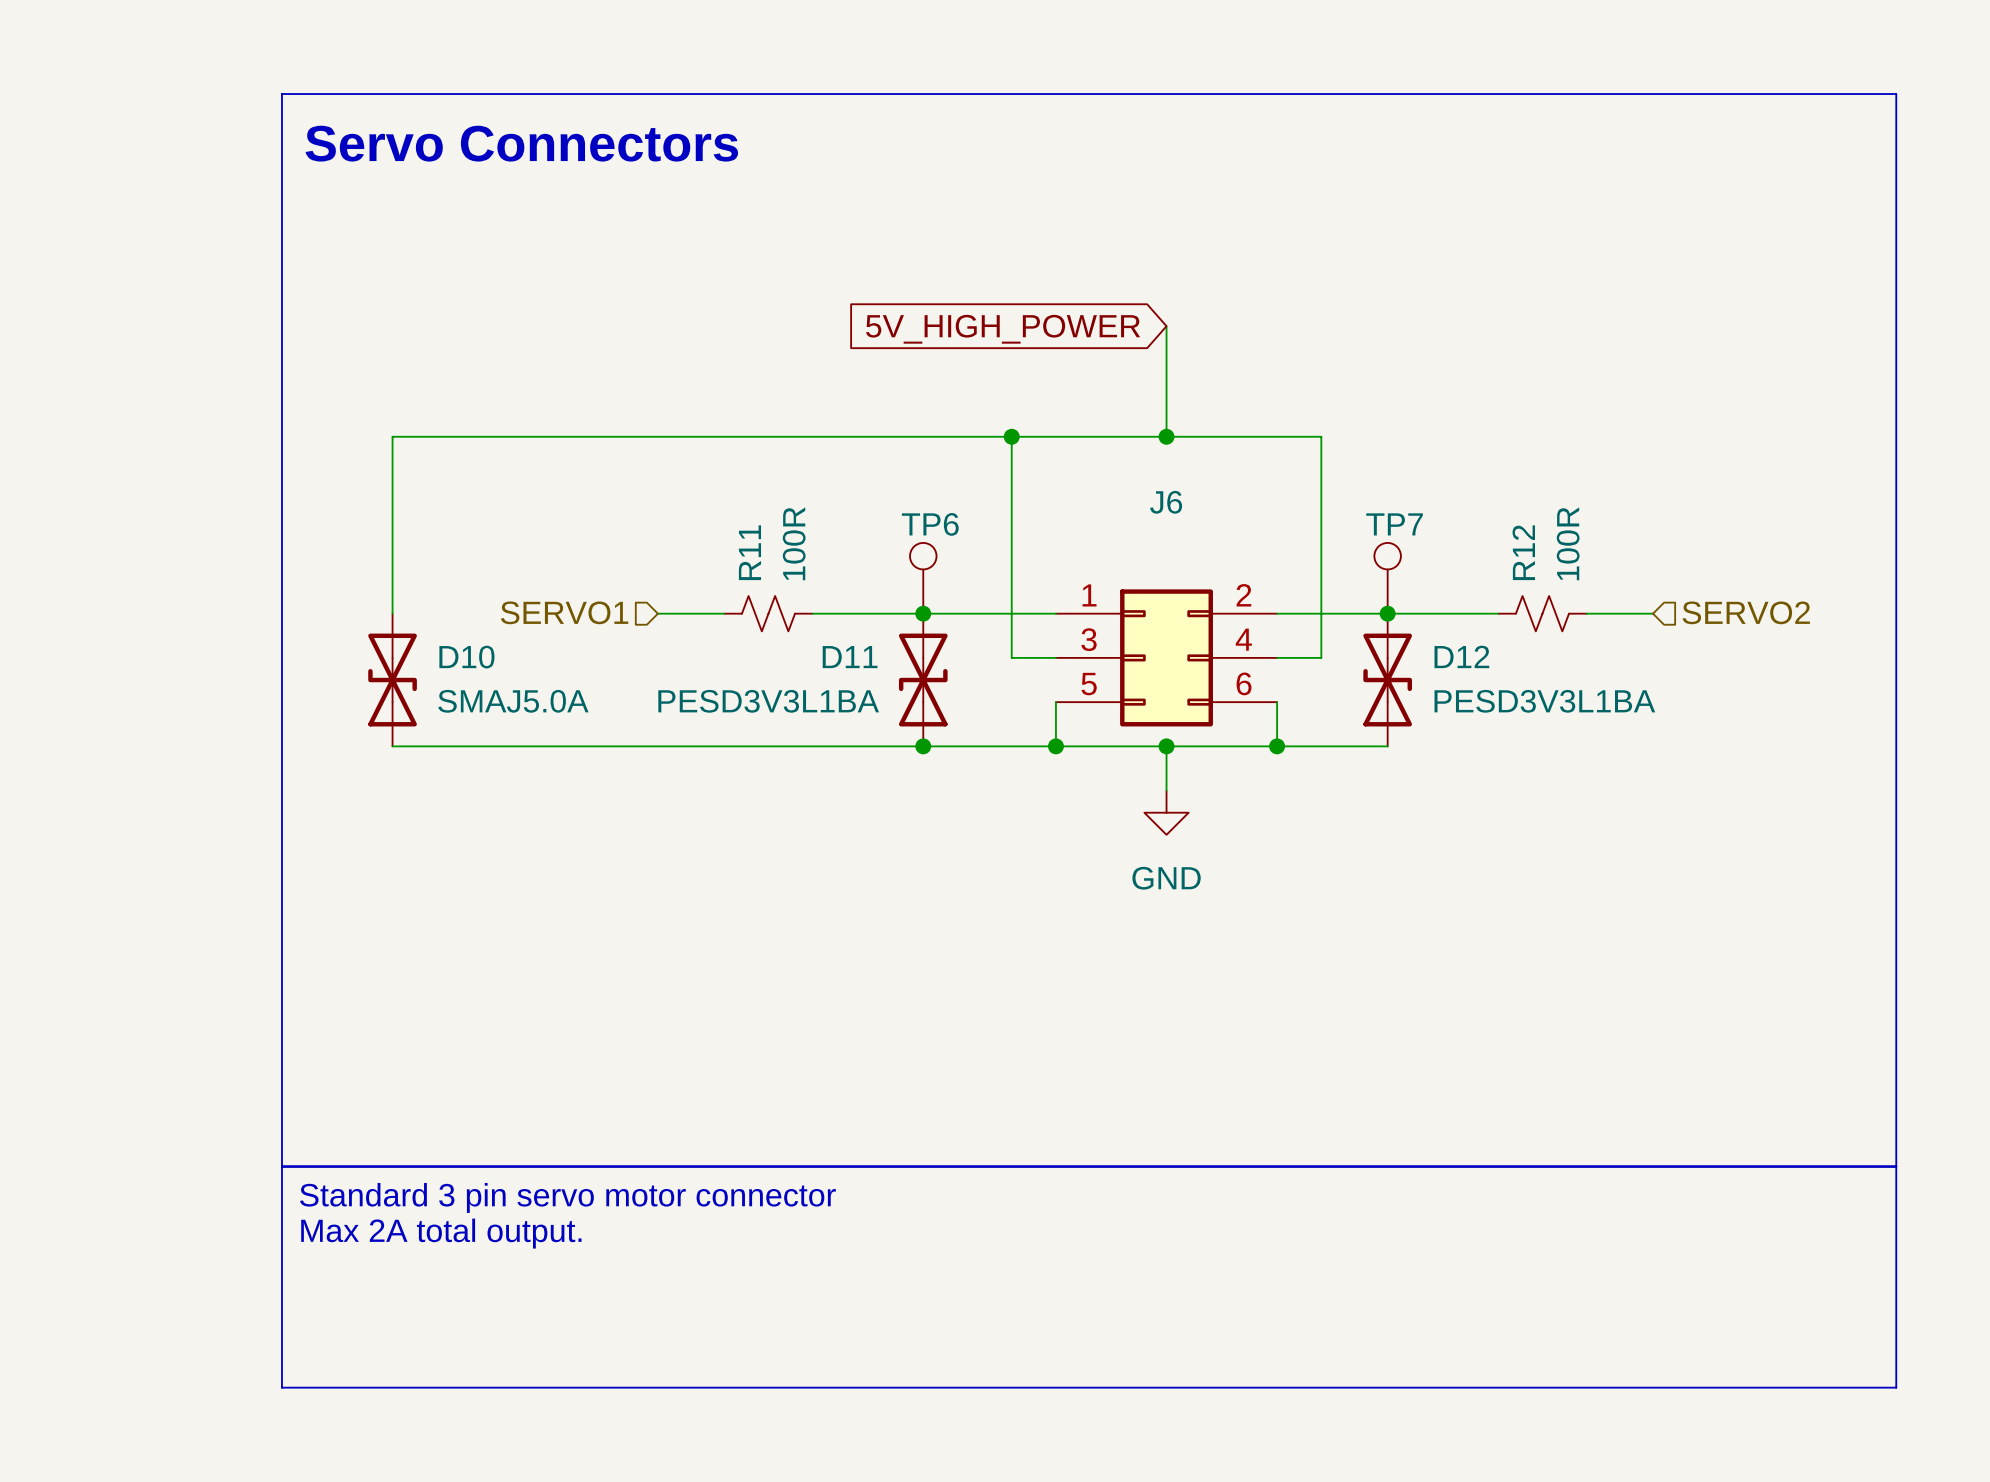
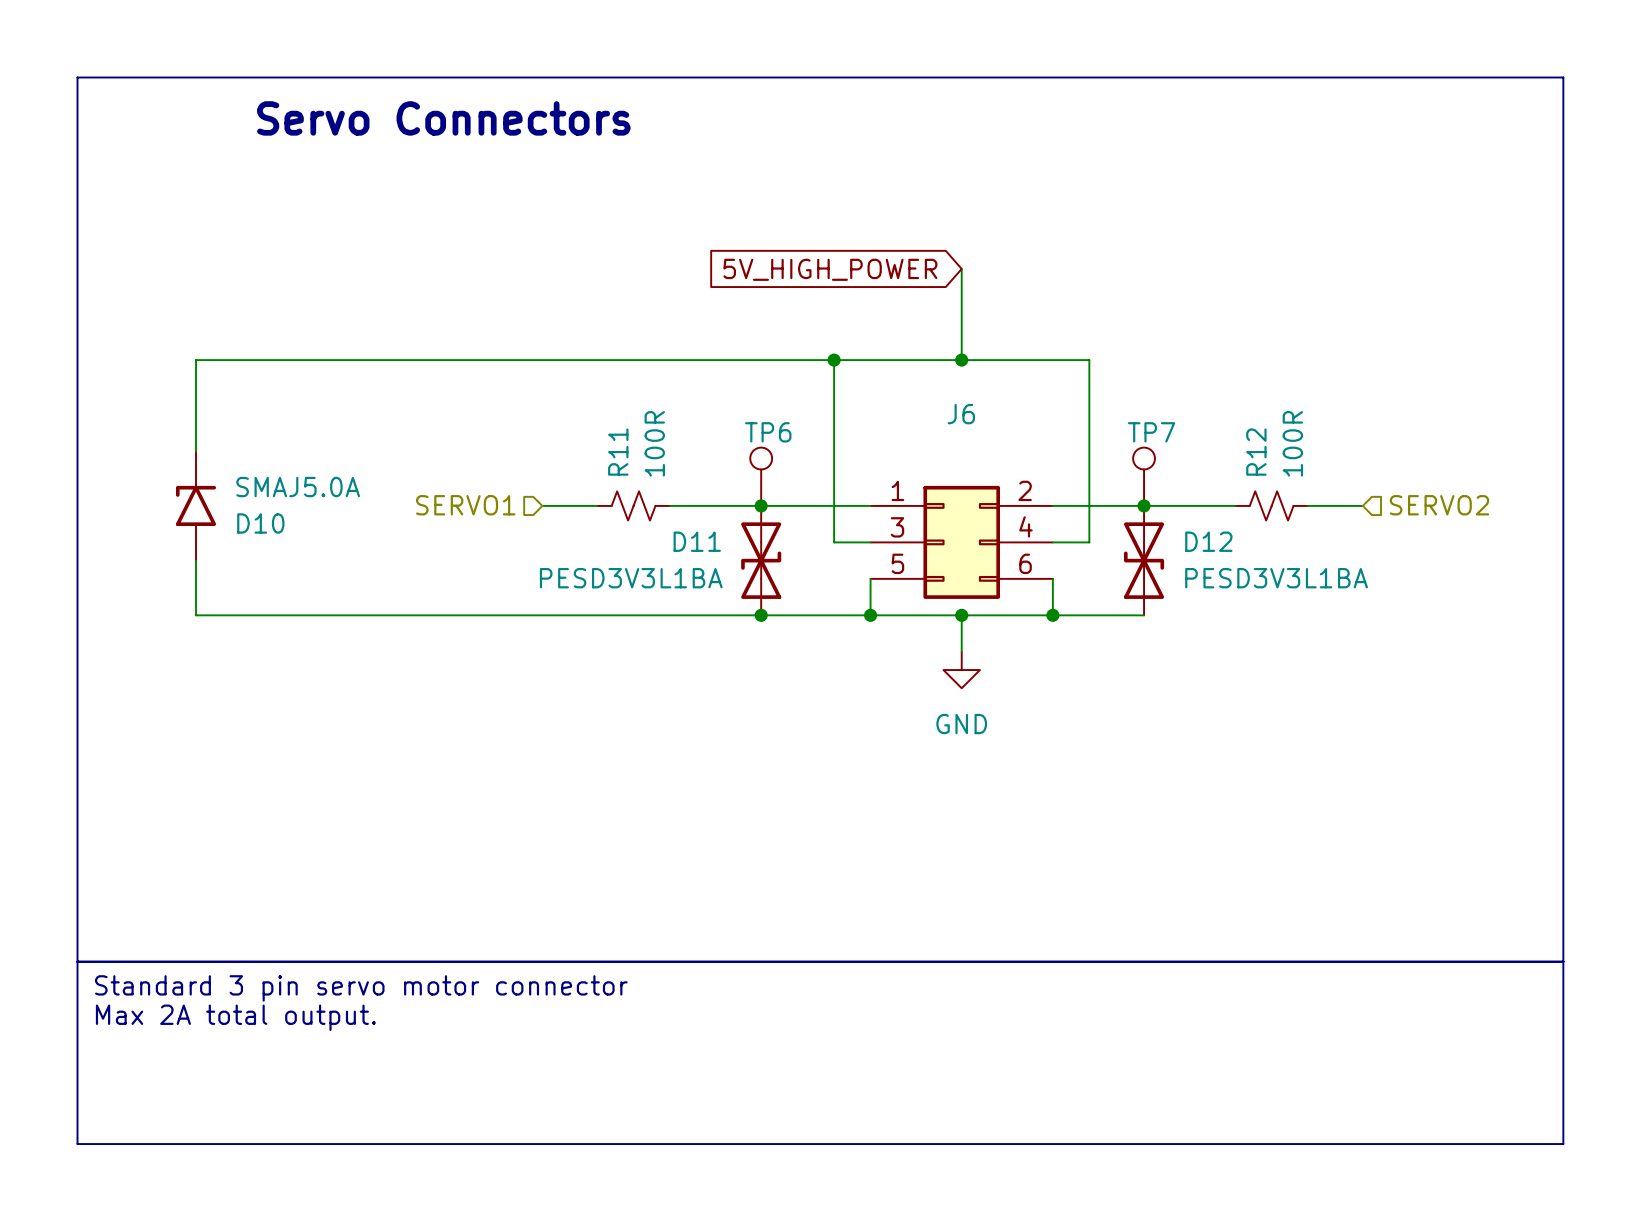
line: (281, 94) (281, 1387) -> (232, 77) (77, 77) (77, 1144) (232, 1144)
wire: (392, 436) (392, 613) -> (323, 360) (196, 360) (196, 451)
D10 symbol: [368, 613, 417, 747] -> [175, 451, 217, 561]
D10 name position: D10 (466, 657) -> D10 (260, 523)
wire: none -> (196, 560) (196, 615) (323, 615)
D10 value position: SMAJ5.0A (513, 701) -> SMAJ5.0A (298, 487)
line: none -> (77, 961) (232, 961)
text position: Standard 3 pin servo motor connector (567, 1197) -> Standard 3 pin servo motor connector (361, 988)
text position: Max 2A total output. (441, 1233) -> Max 2A total output. (235, 1017)

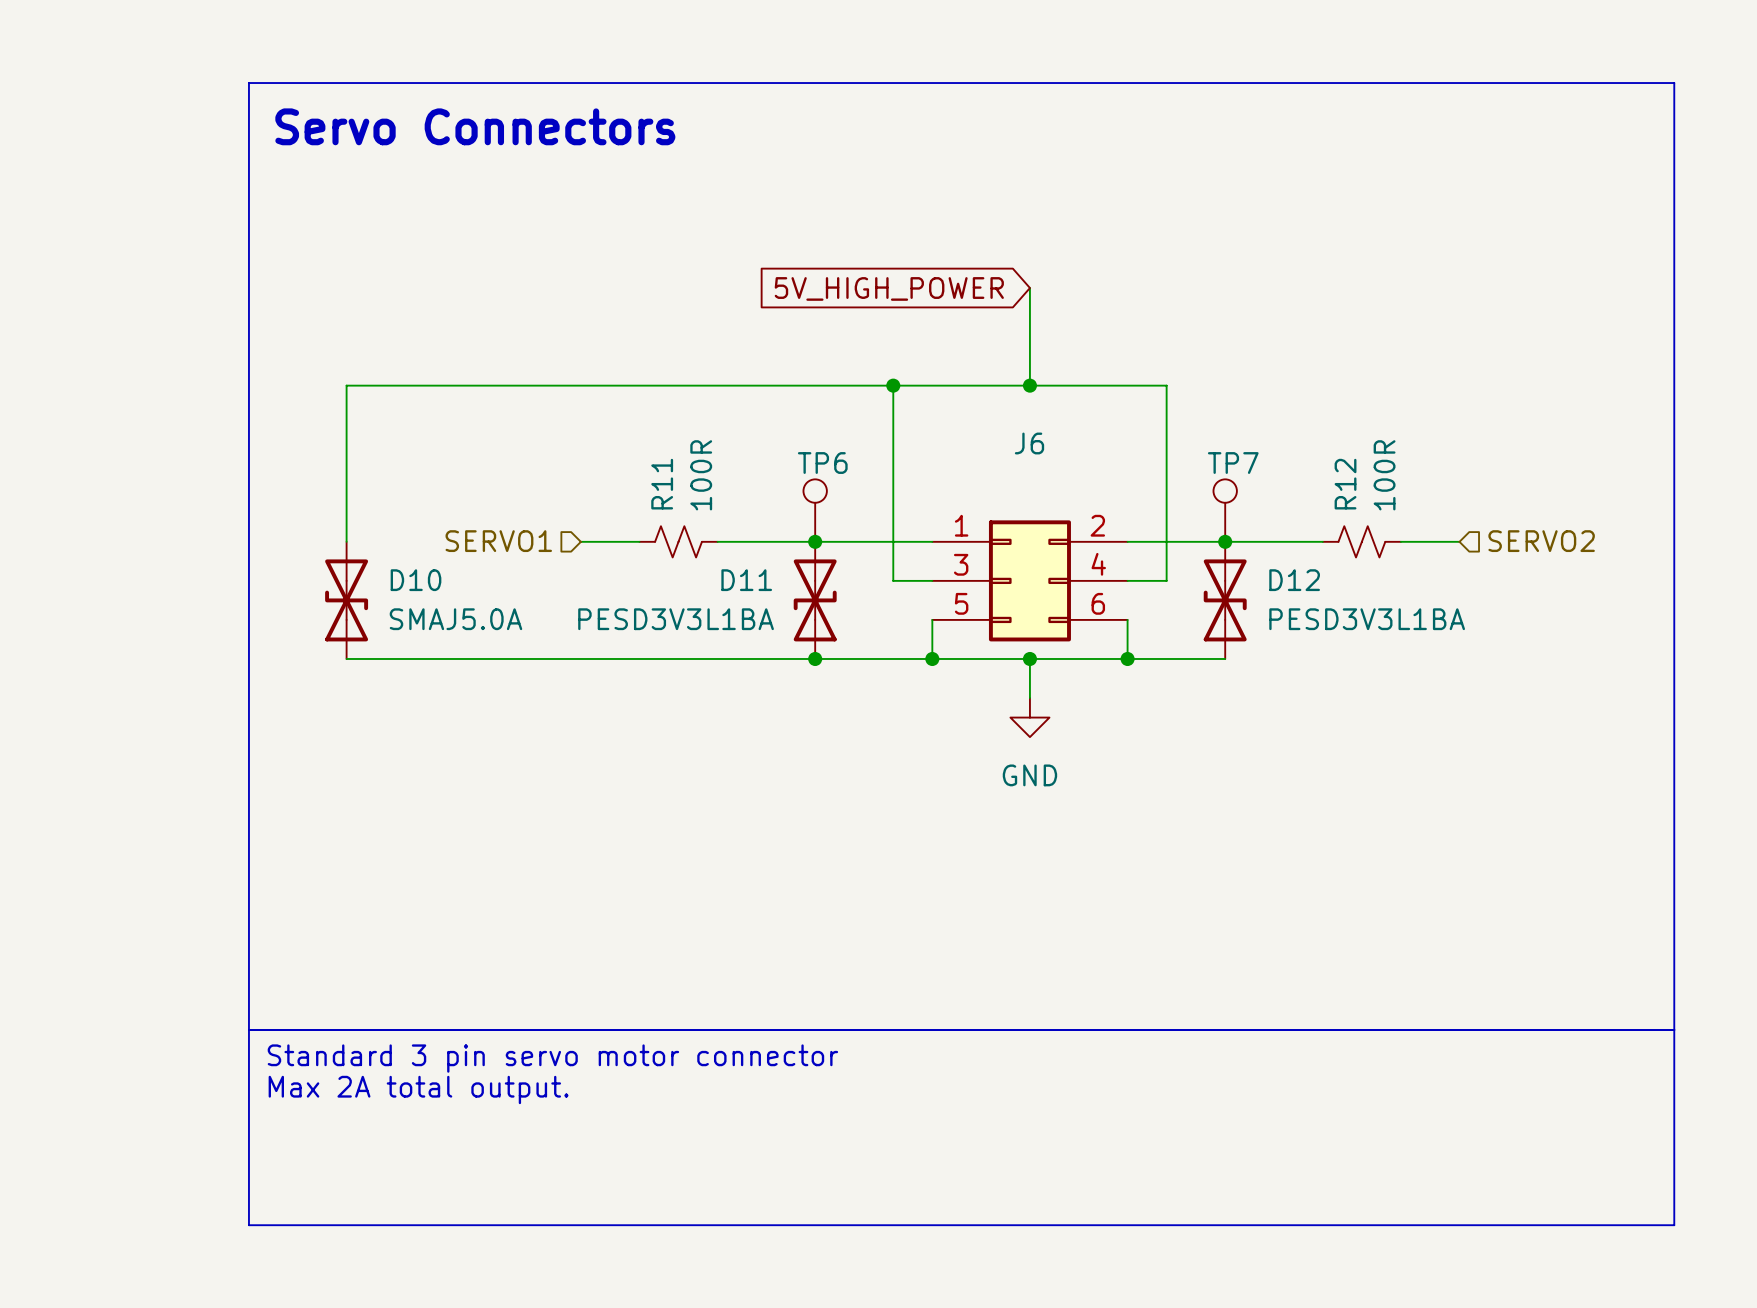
line: (232, 77) (77, 77) (77, 1144) (232, 1144) -> (248, 83) (248, 1225)
wire: (323, 360) (196, 360) (196, 451) -> (346, 385) (346, 541)
D10 symbol: [175, 451, 217, 561] -> [325, 541, 369, 659]
D10 value position: SMAJ5.0A (298, 487) -> SMAJ5.0A (455, 619)
D10 name position: D10 (260, 523) -> D10 (416, 580)
wire: (196, 560) (196, 615) (323, 615) -> none
line: (77, 961) (232, 961) -> none
text position: Standard 3 pin servo motor connector (361, 988) -> Standard 3 pin servo motor connector (552, 1058)
text position: Max 2A total output. (235, 1017) -> Max 2A total output. (418, 1089)

